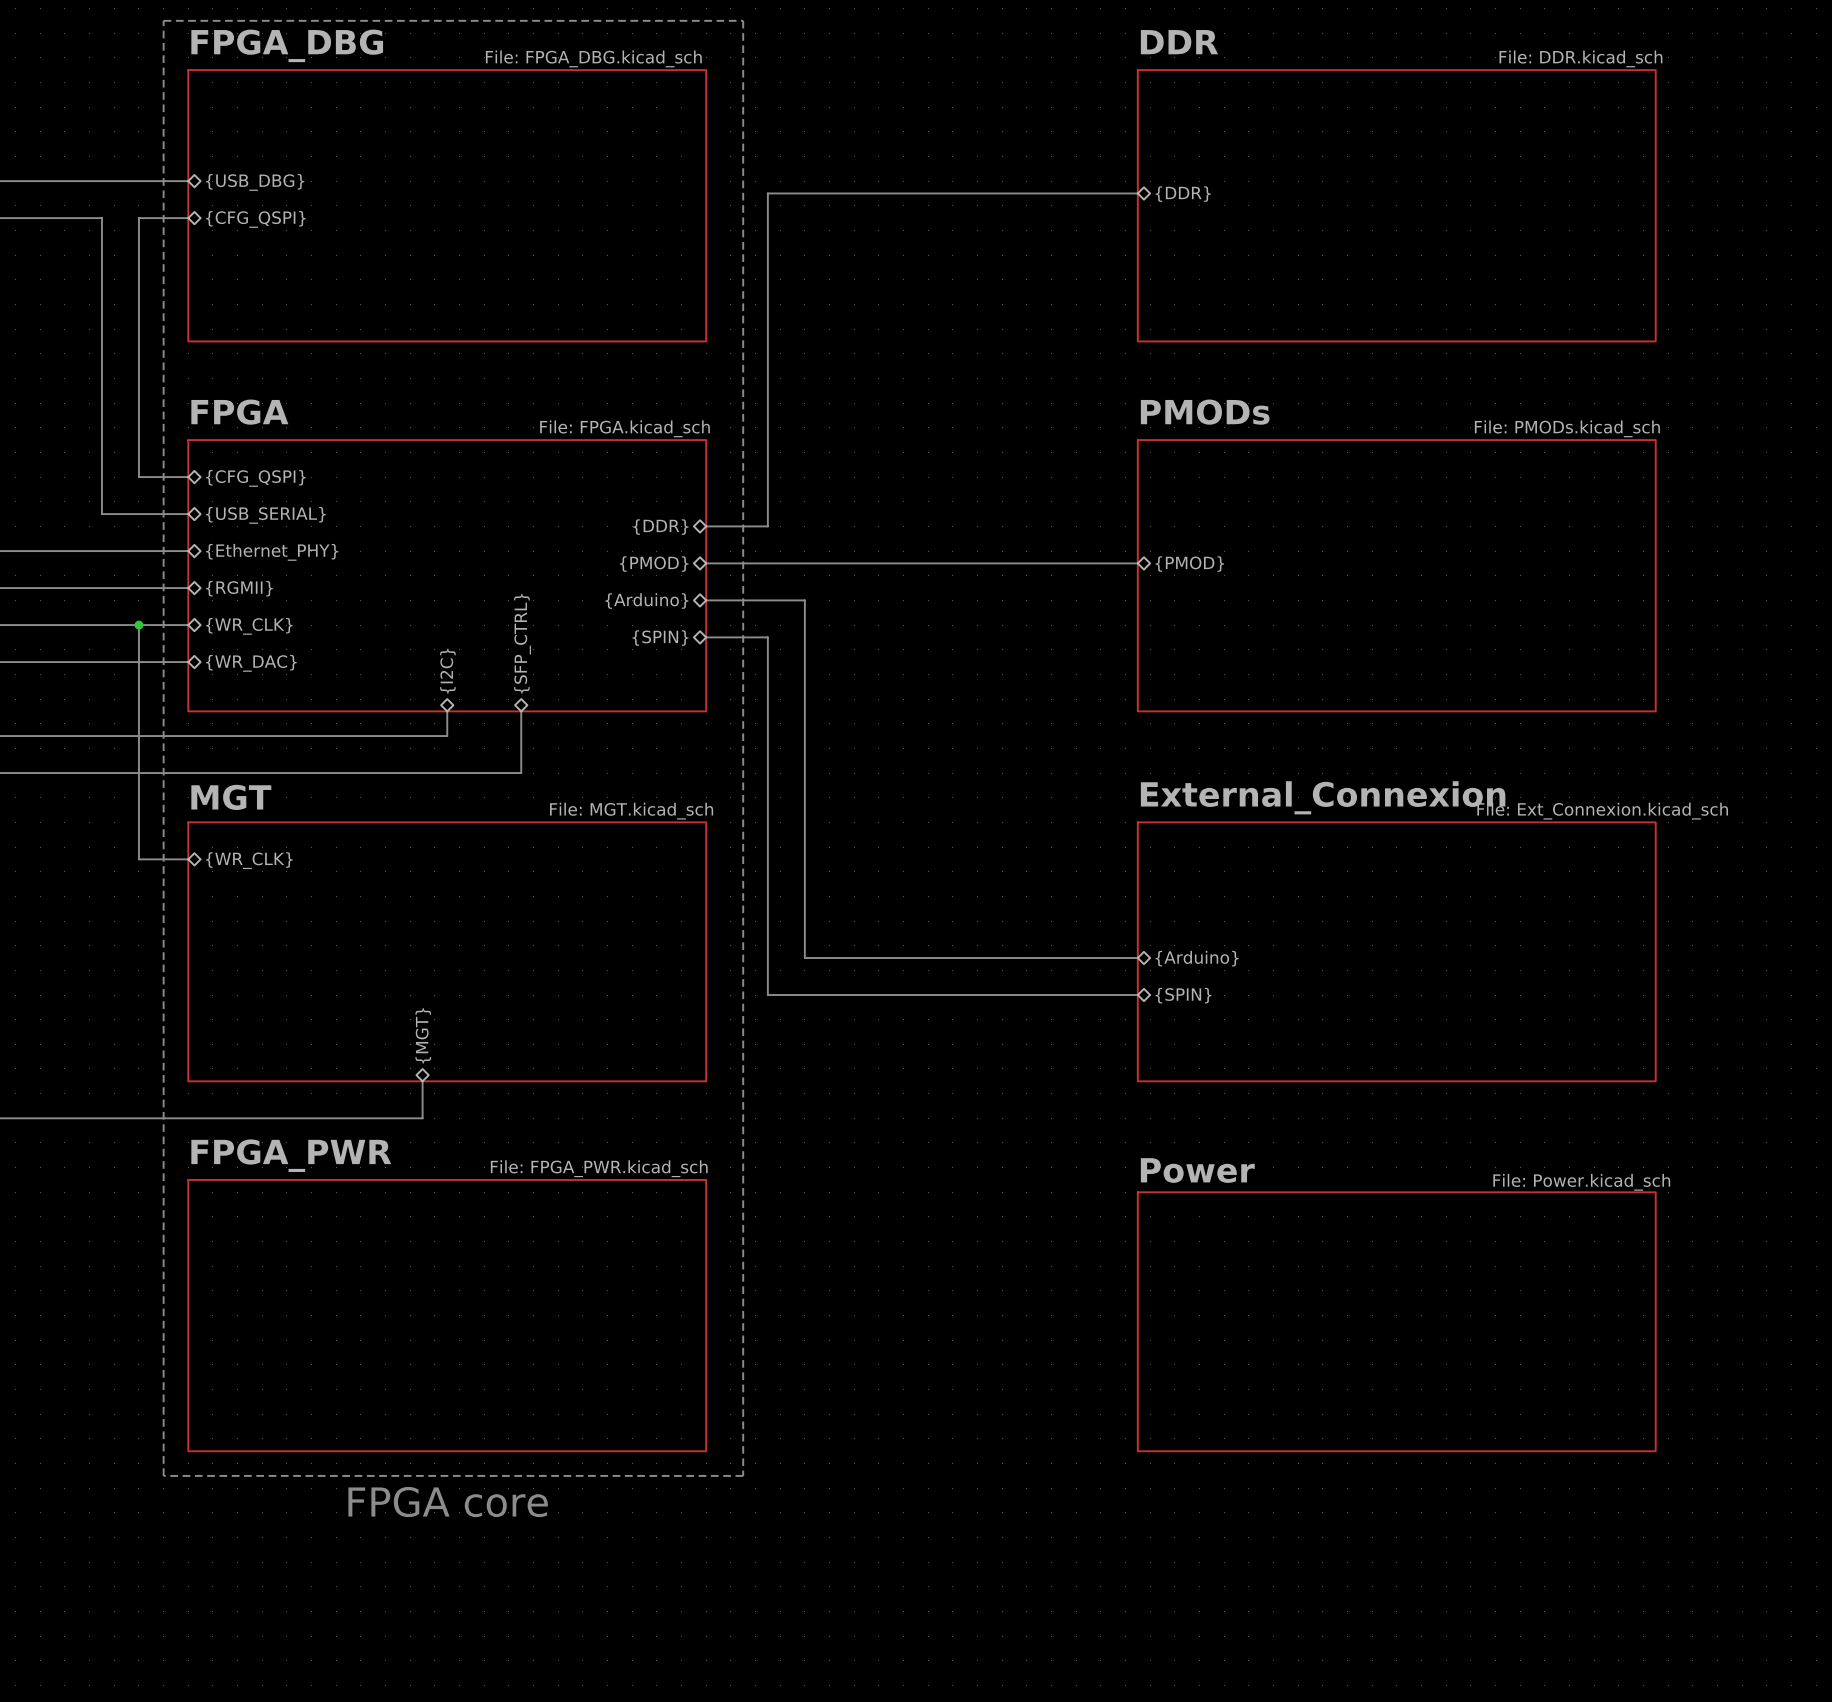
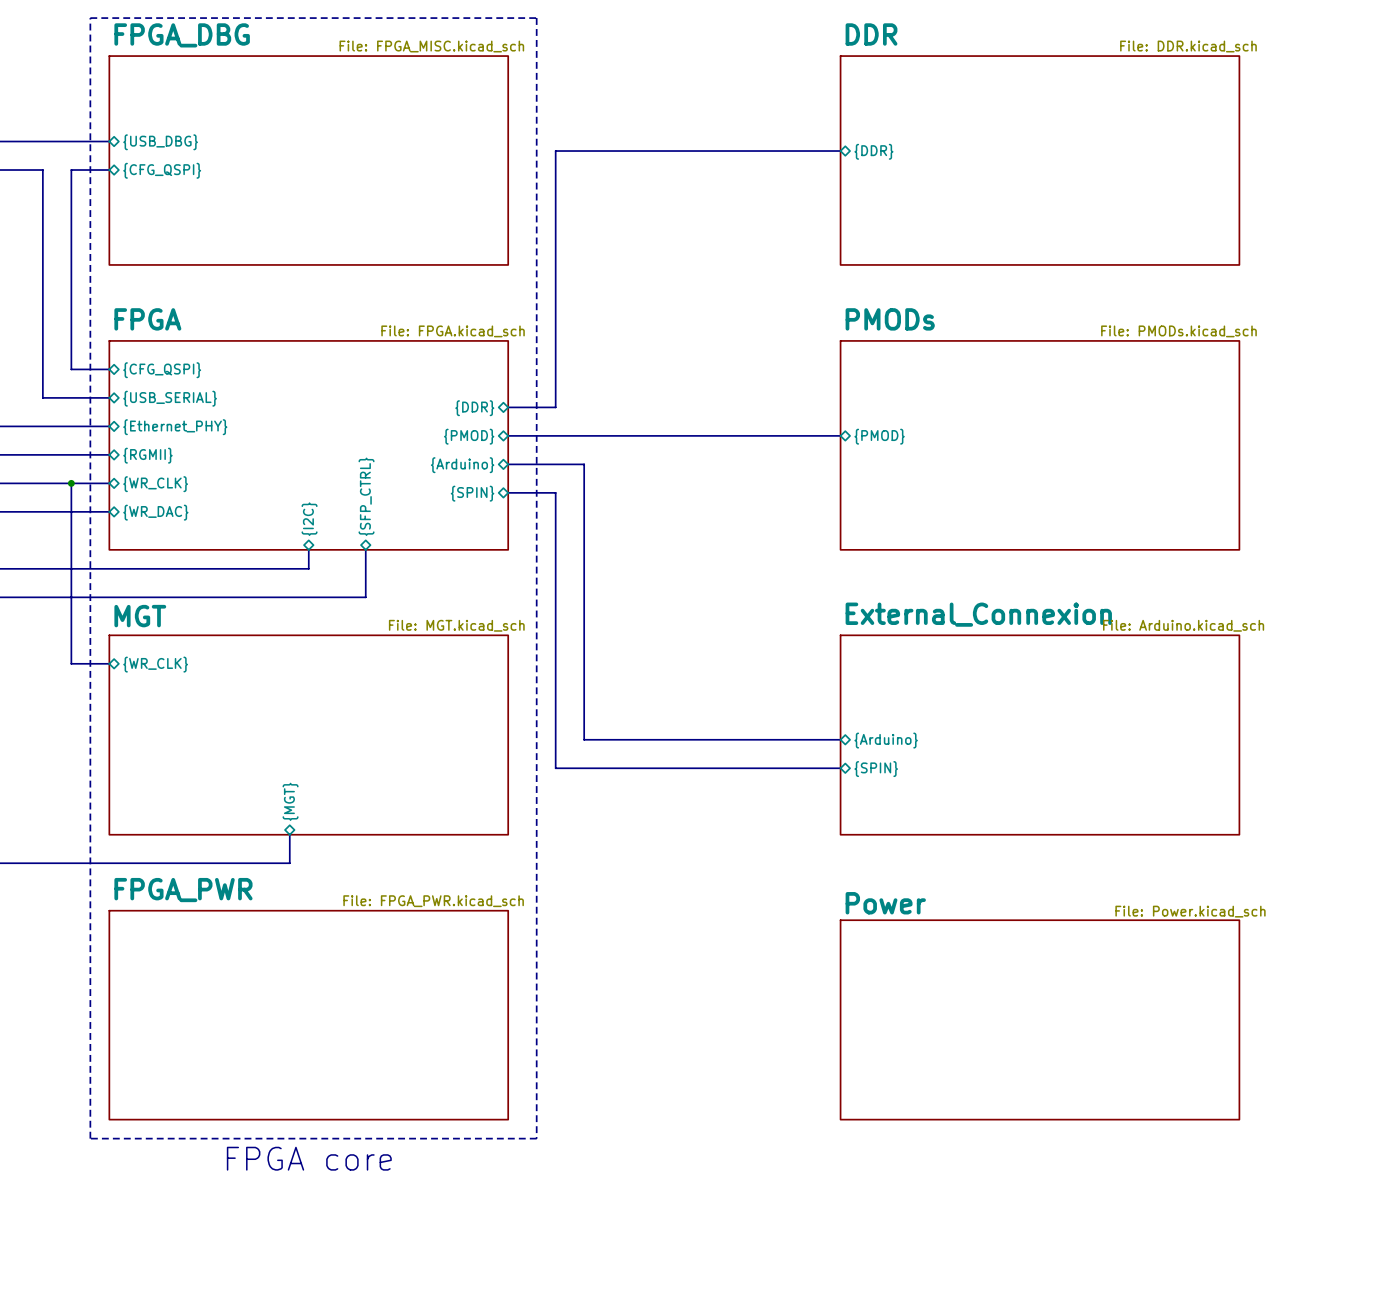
sheet FPGA_DBG value: File: FPGA_DBG.kicad_sch (593, 58) -> File: FPGA_MISC.kicad_sch (431, 46)
sheet External_Connexion value: File: Ext_Connexion.kicad_sch (1602, 811) -> File: Arduino.kicad_sch (1183, 625)

